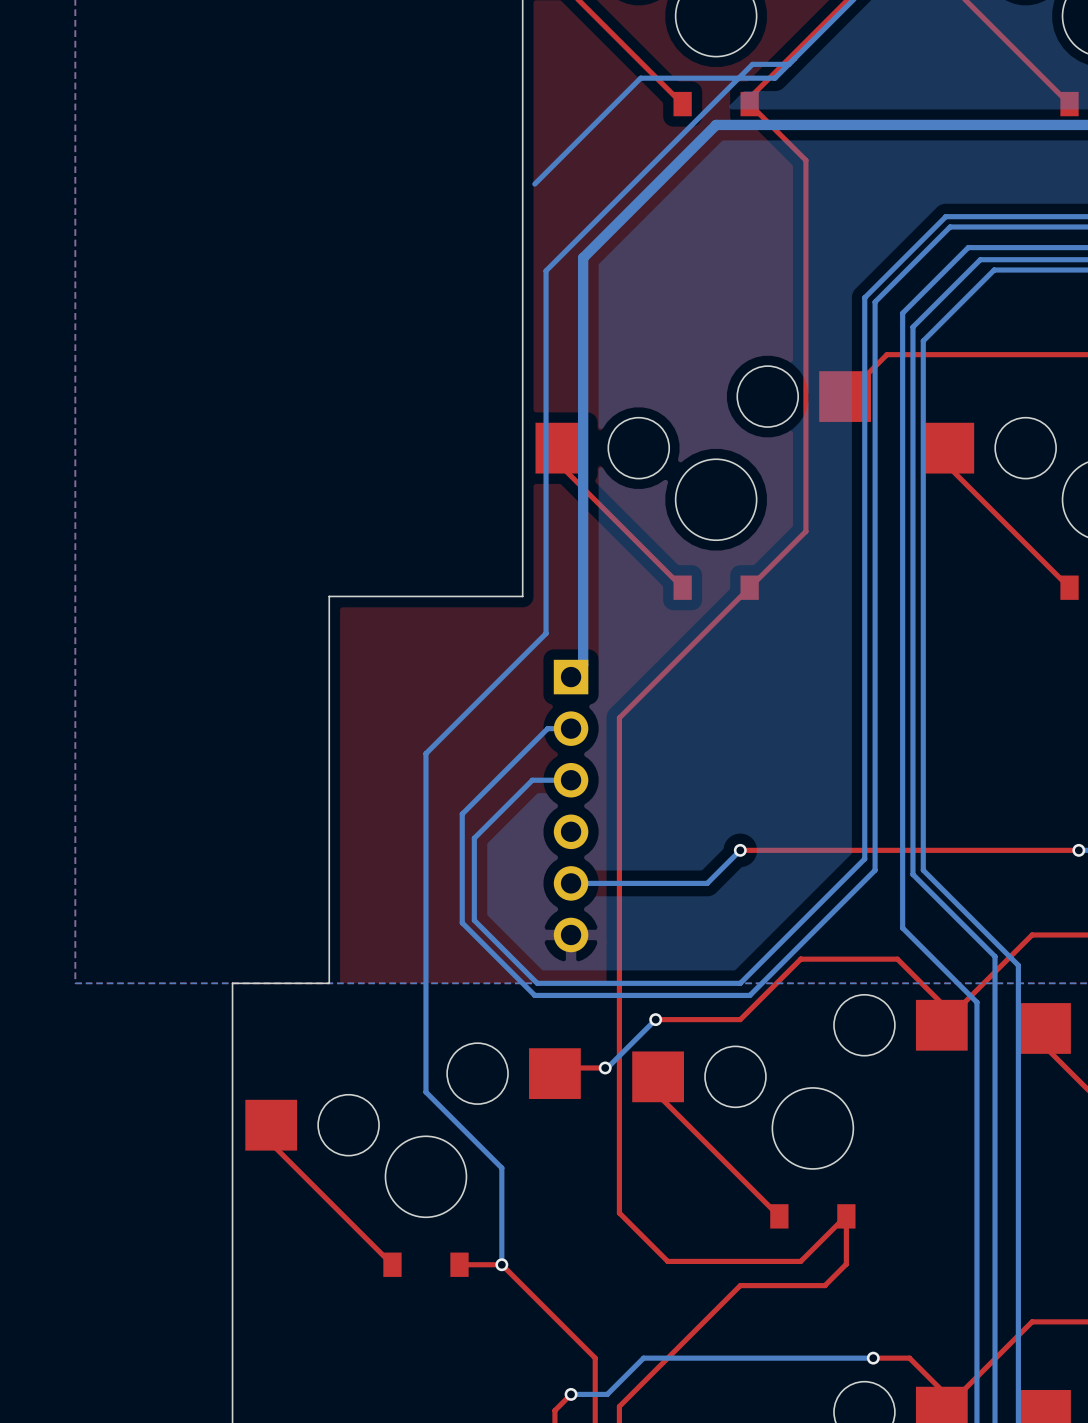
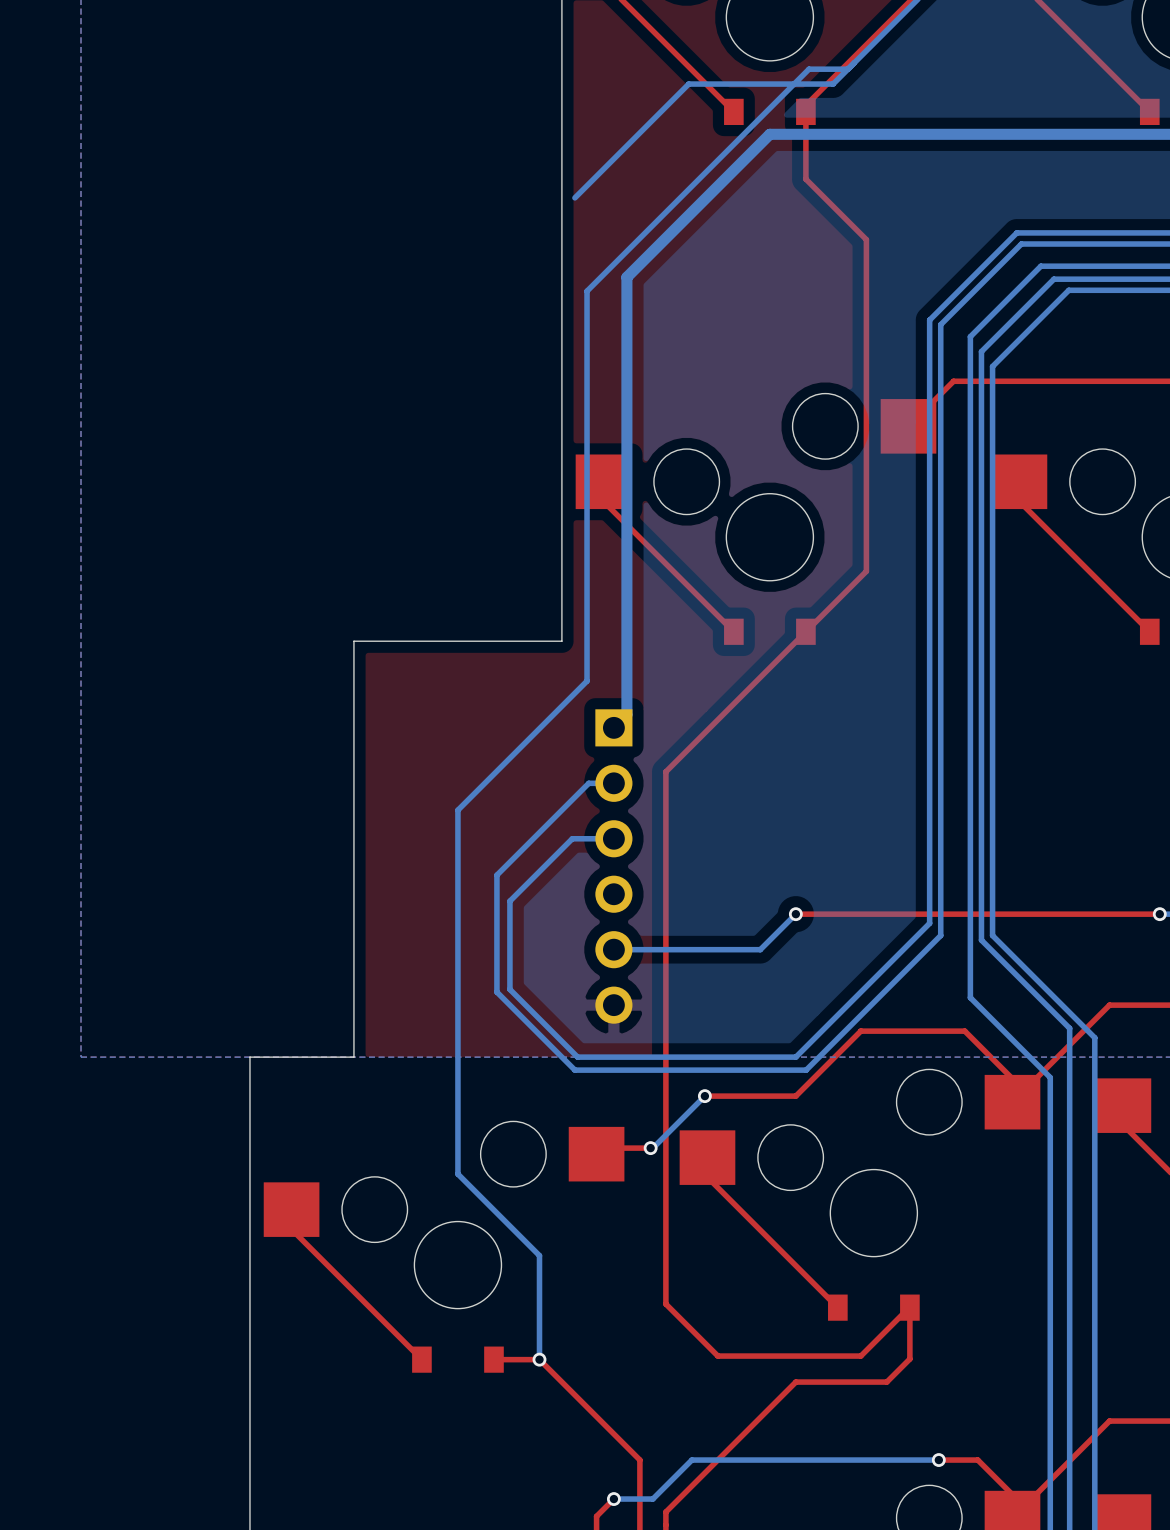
top track: (749, 104) (805, 160) (805, 222) -> (805, 111) (805, 179) (866, 239)

